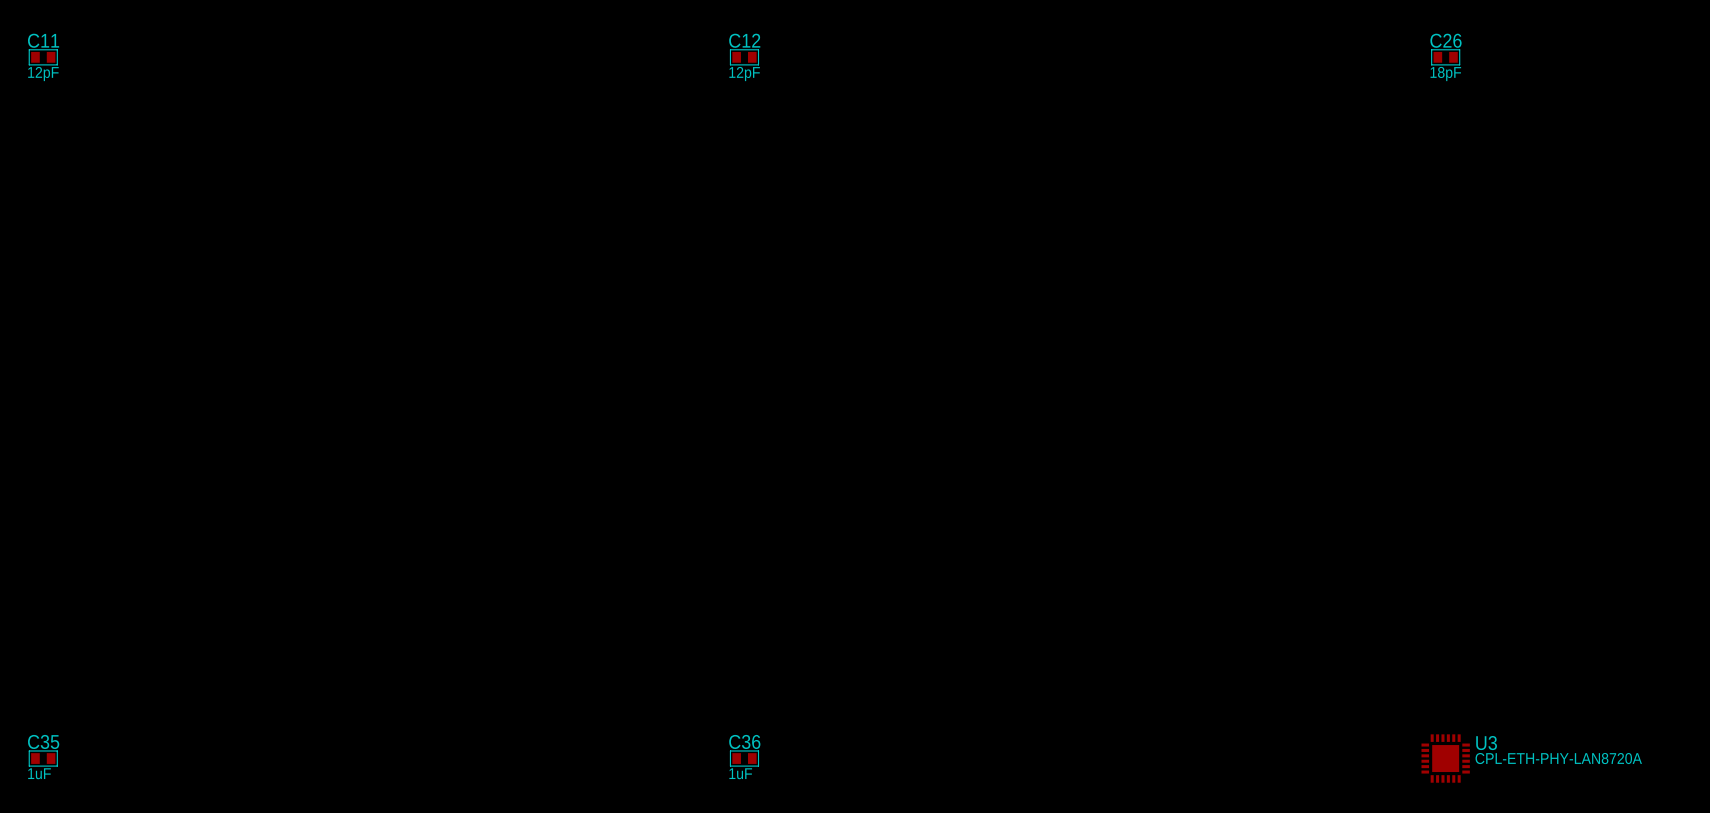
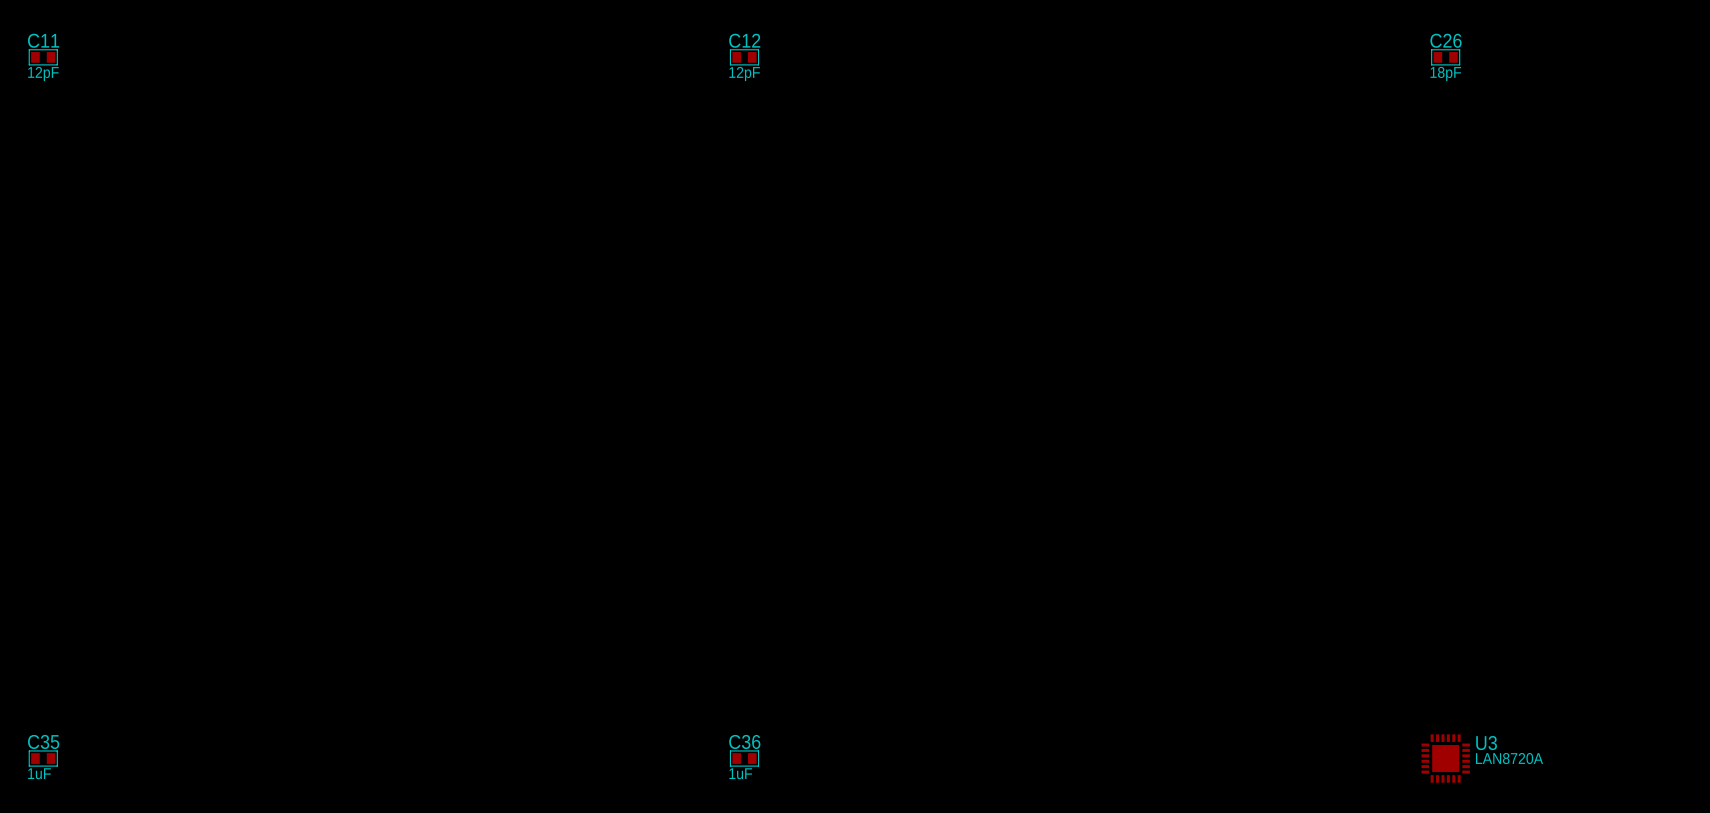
U3 value: CPL-ETH-PHY-LAN8720A (1558, 758) -> LAN8720A (1509, 758)

